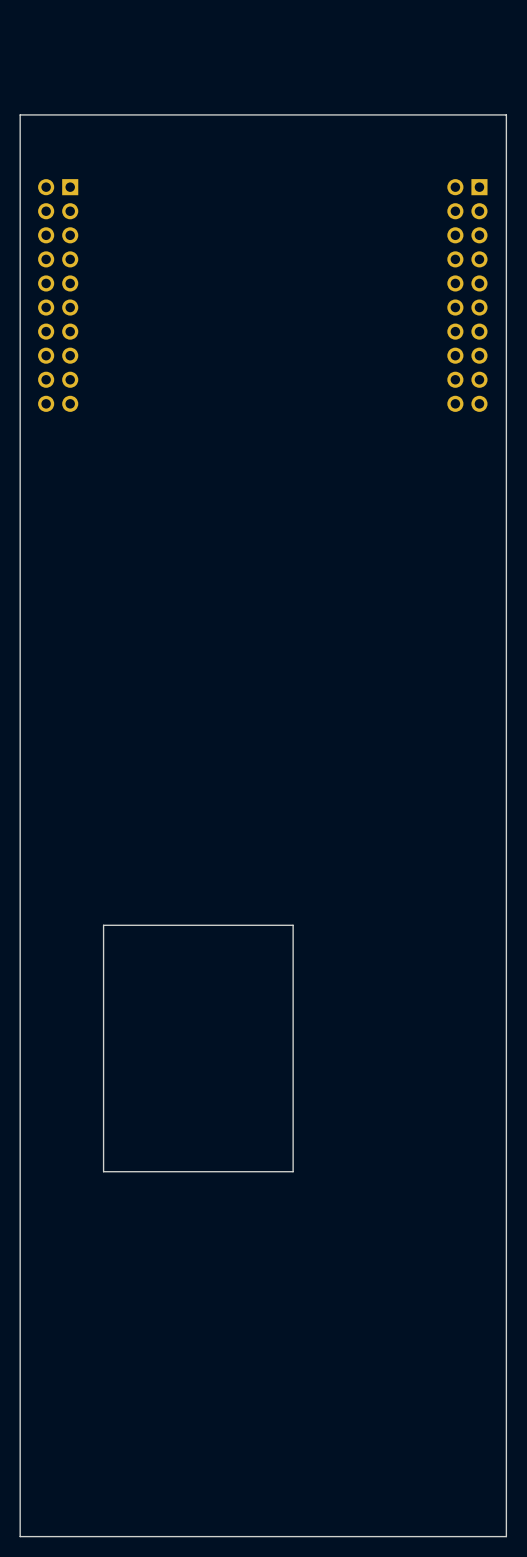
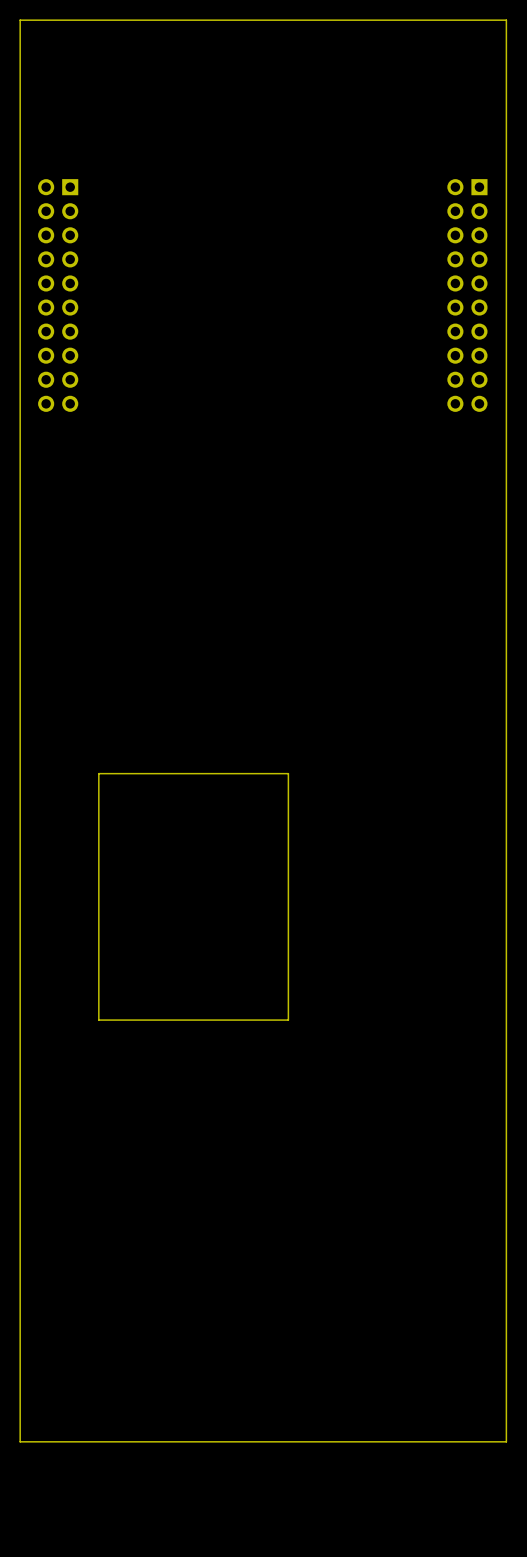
board edge: (506, 114) (20, 114) -> (506, 114) (506, 20) (20, 20) (20, 114)
board edge: (293, 925) (103, 925) (103, 1171) (293, 1171) (293, 925) -> (288, 773) (98, 773) (98, 1020) (288, 1020) (288, 773)
board edge: (506, 1441) (506, 1536) (20, 1536) (20, 1441) -> (506, 1441) (20, 1441)

